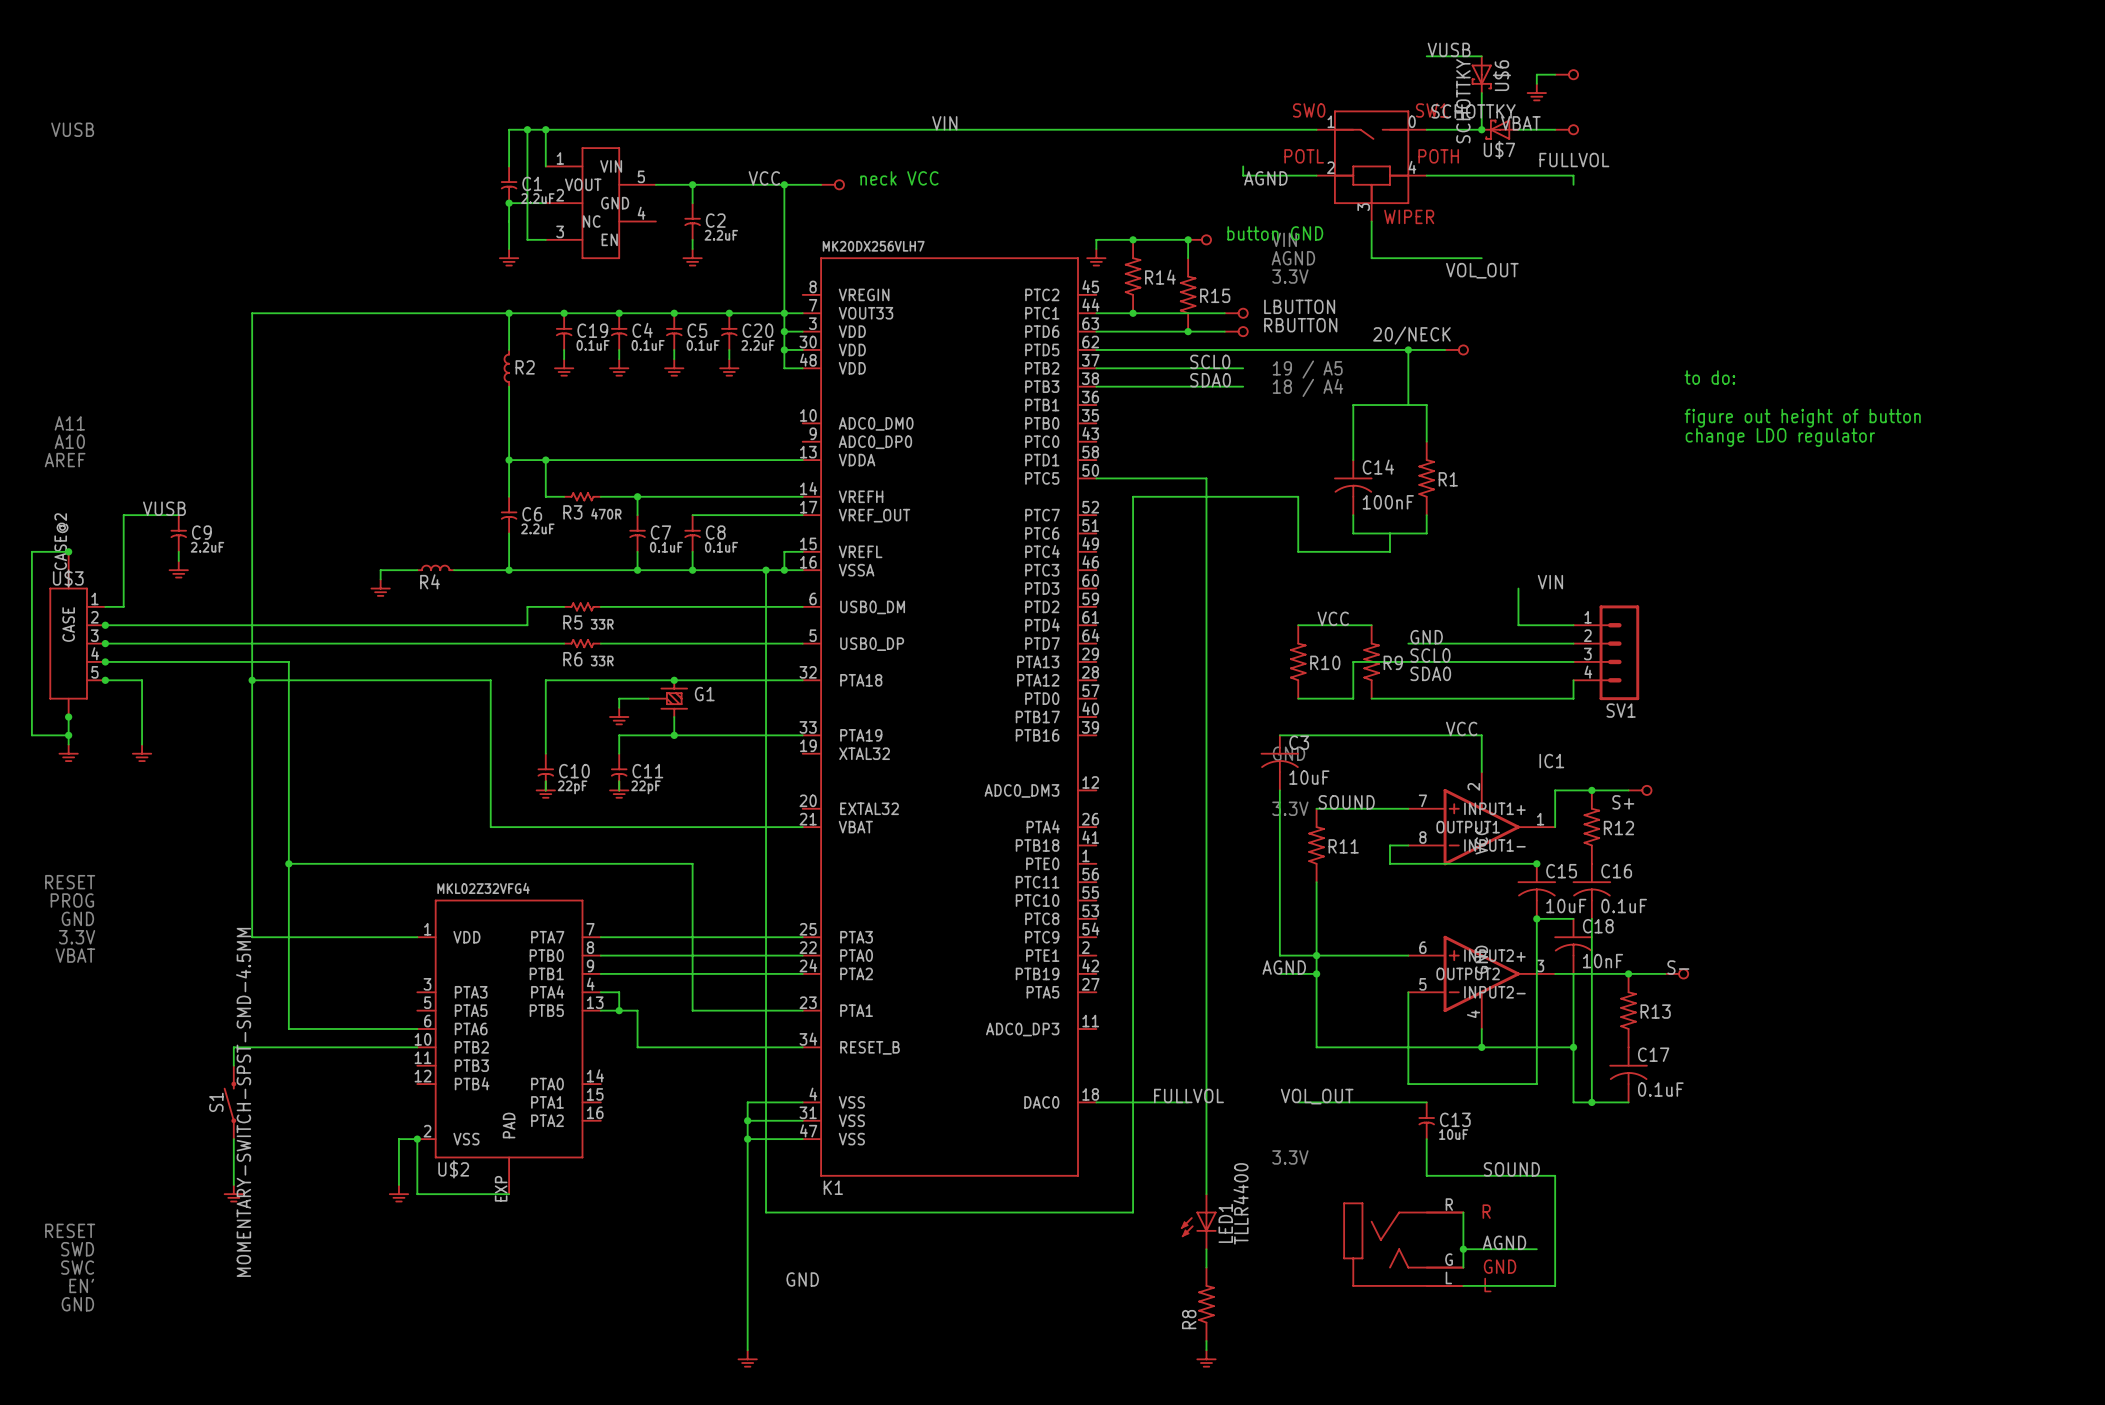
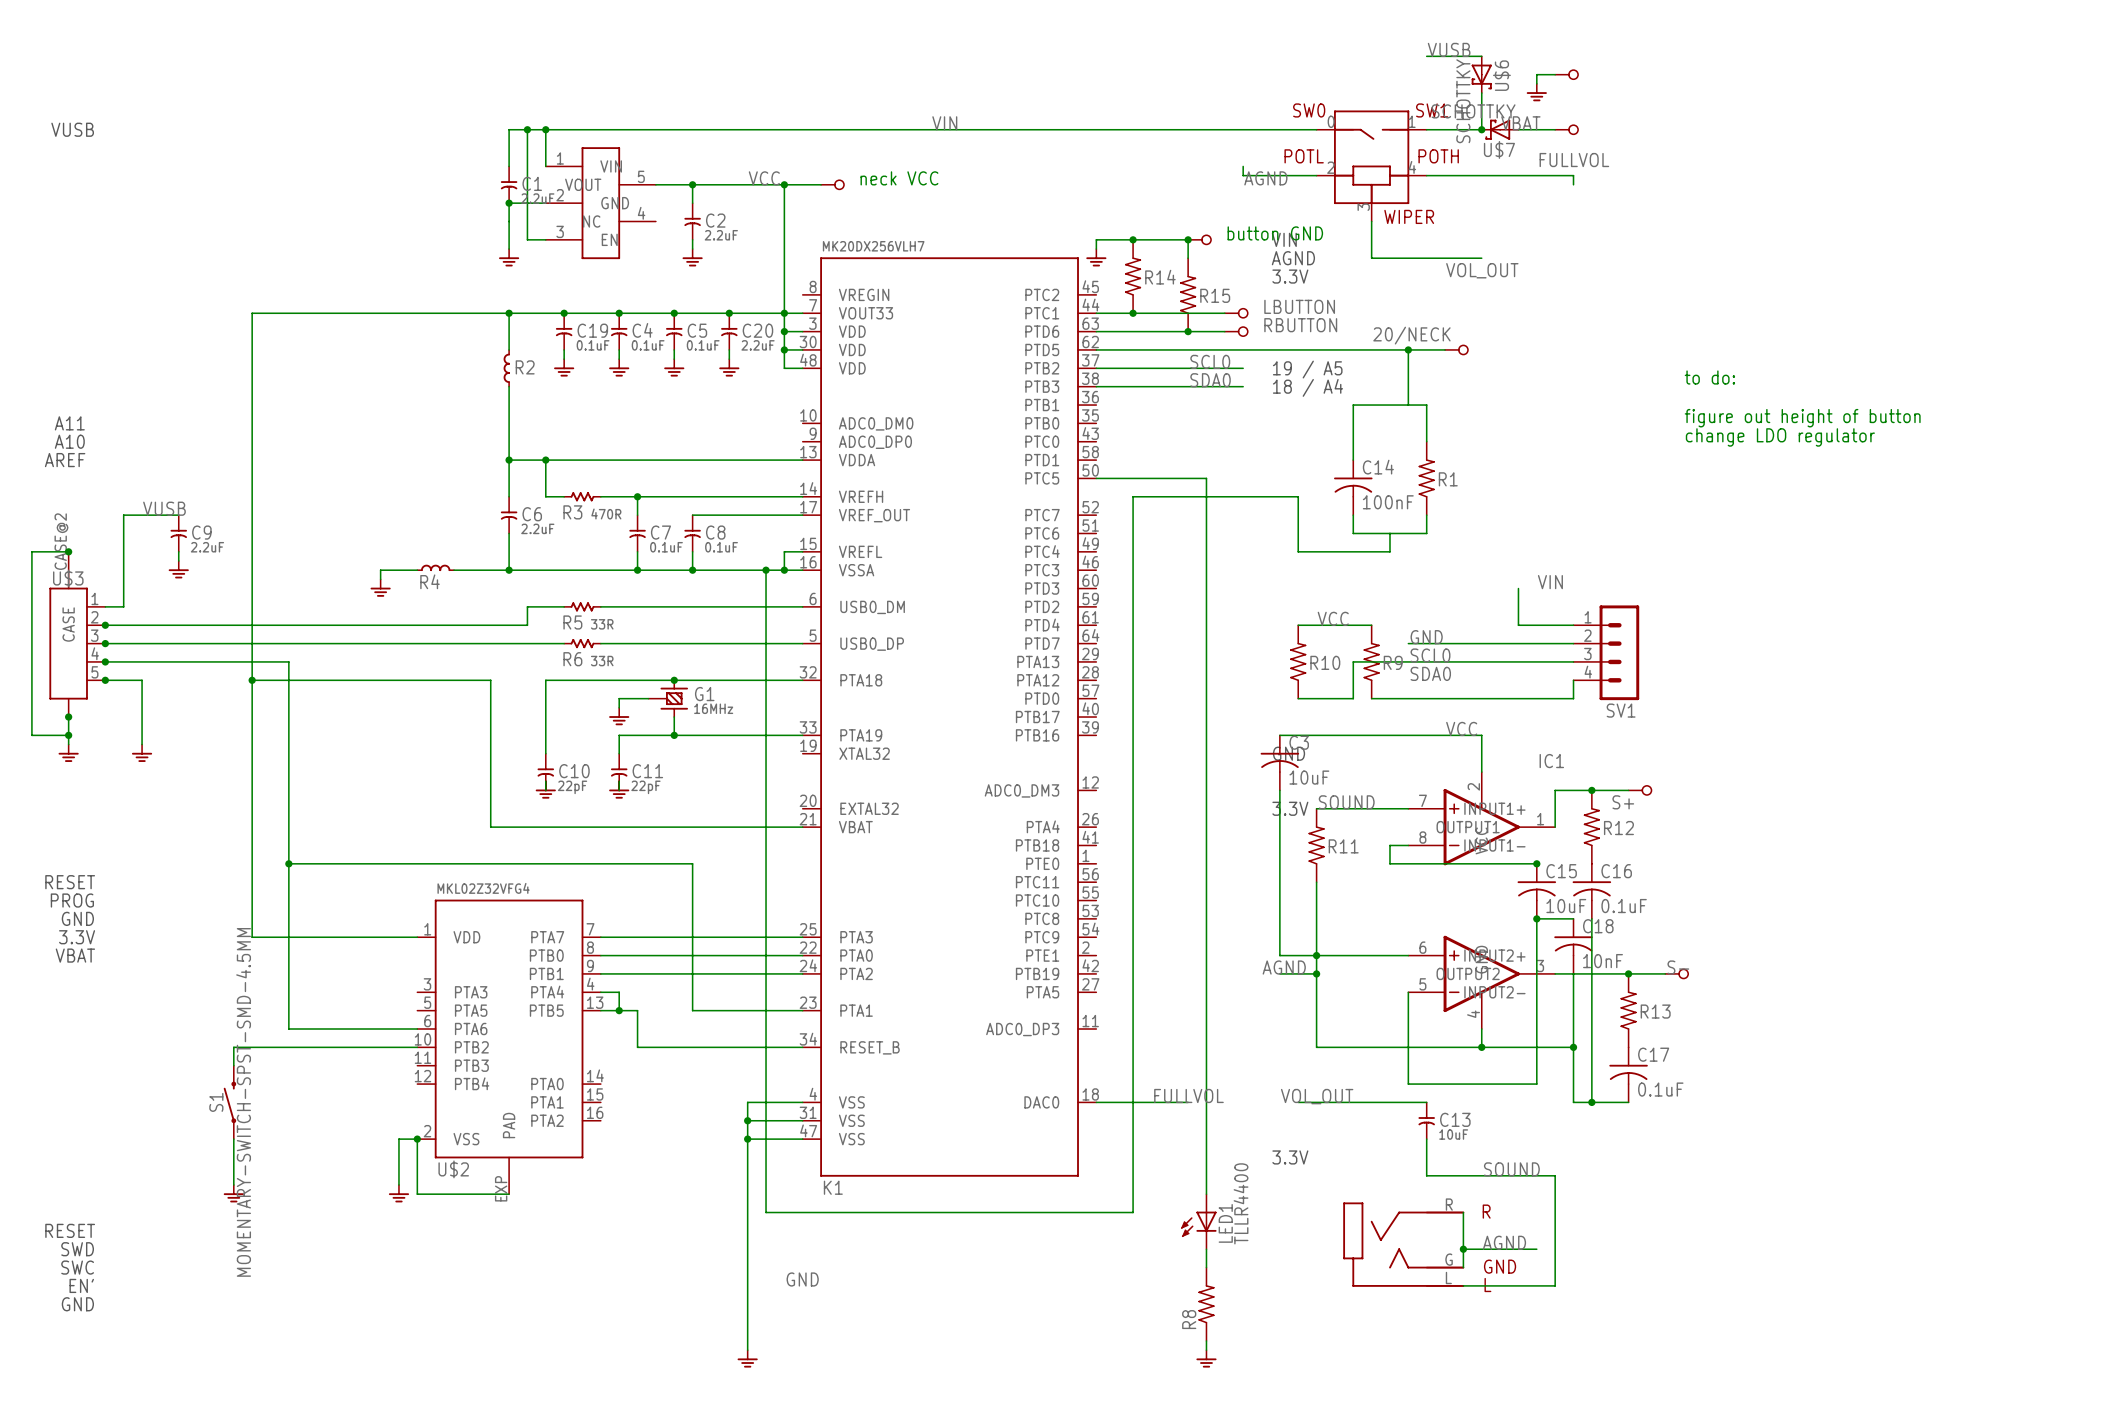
part pin number: 1 (1331, 121) -> 0 (1331, 121)
part pin number: 0 (1412, 121) -> 1 (1412, 121)
G1 value: none -> 16MHz (713, 708)

